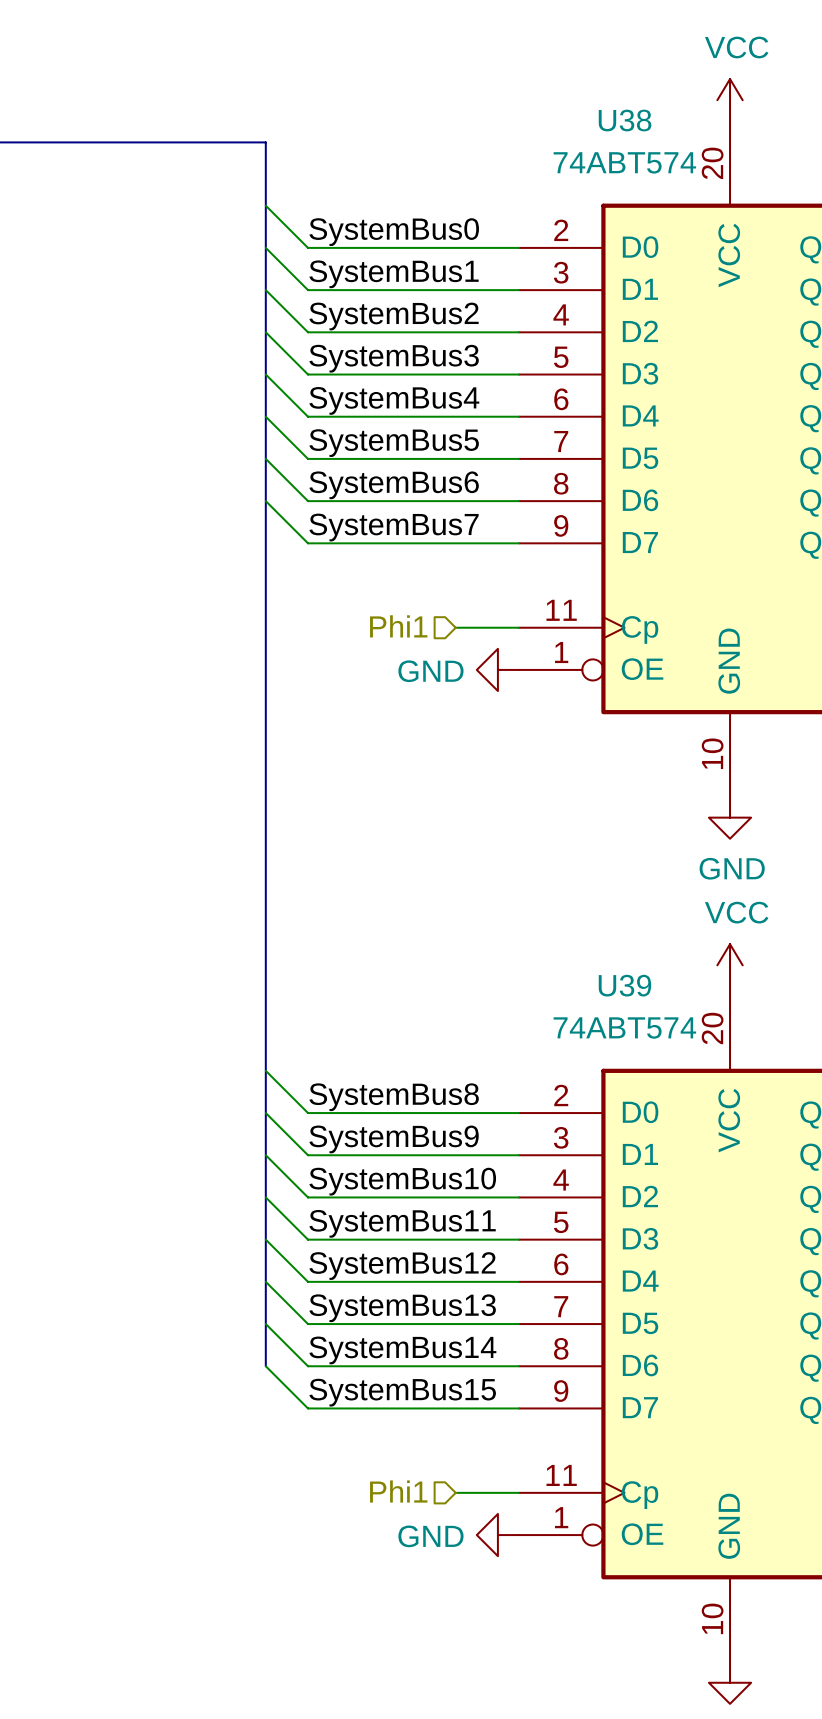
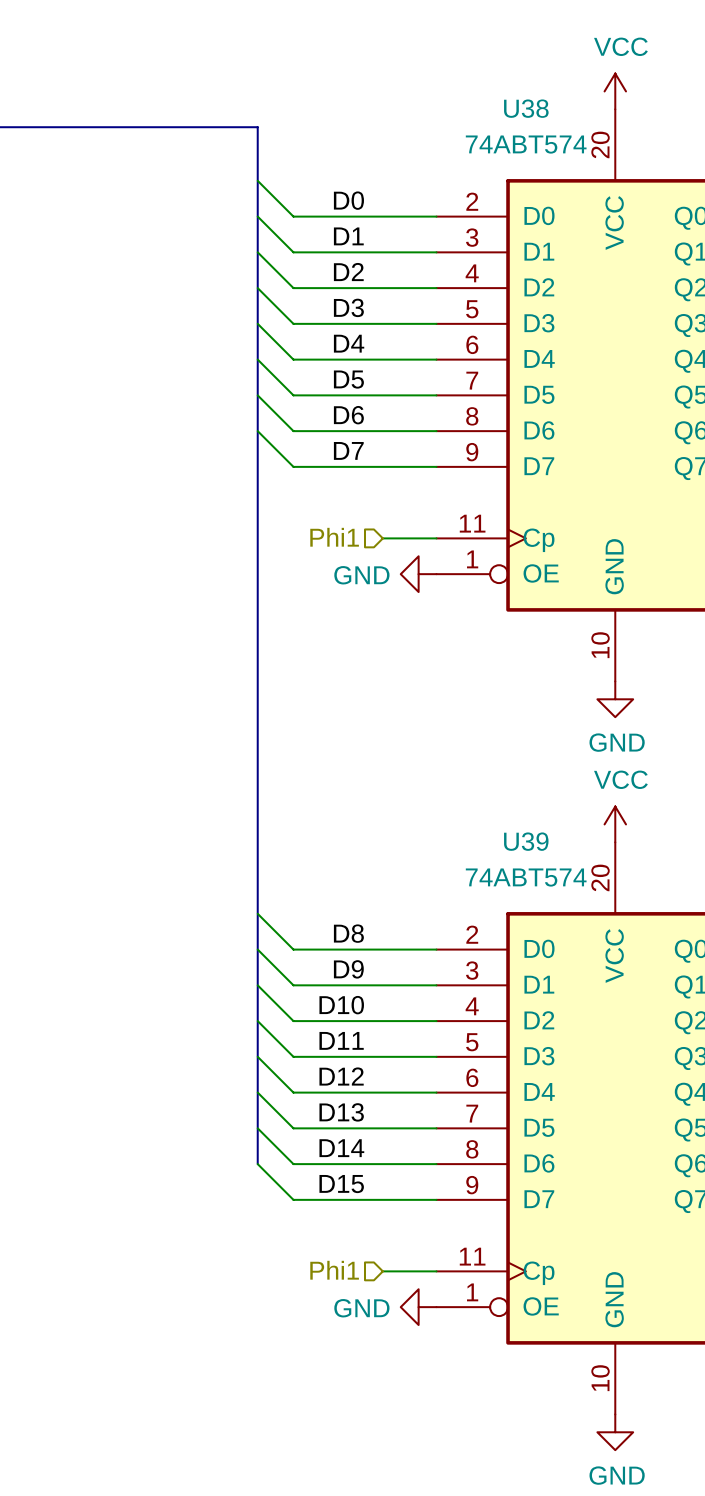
bus: (265, 142) (265, 1366) -> (221, 127) (257, 127) (257, 1164)
wire: (265, 205) (308, 247) (350, 247) -> (257, 180) (293, 216)
label: none -> D0 (348, 200)
label: SystemBus0 (394, 232) -> none
wire: (265, 247) (308, 290) (350, 290) -> (257, 216) (293, 252)
label: none -> D1 (348, 236)
label: SystemBus1 (394, 274) -> none
wire: (265, 290) (308, 332) (350, 332) -> (257, 252) (293, 288)
label: none -> D2 (348, 272)
label: SystemBus2 (394, 316) -> none
wire: (265, 332) (308, 374) (350, 374) -> (257, 288) (293, 323)
label: none -> D3 (348, 307)
label: SystemBus3 (394, 358) -> none
wire: (265, 374) (308, 416) (350, 416) -> (257, 323) (293, 359)
label: none -> D4 (349, 343)
label: SystemBus4 (394, 400) -> none
wire: (265, 416) (308, 458) (350, 458) -> (257, 359) (293, 395)
label: none -> D5 (348, 379)
label: SystemBus5 (394, 443) -> none
wire: (265, 458) (308, 501) (350, 501) -> (257, 395) (293, 431)
label: none -> D6 (348, 415)
label: SystemBus6 (394, 485) -> none
wire: (265, 501) (308, 543) (350, 543) -> (257, 431) (293, 466)
label: none -> D7 (348, 450)
label: SystemBus7 (394, 527) -> none
wire: (265, 1070) (308, 1113) (350, 1113) -> (257, 913) (293, 949)
label: none -> D8 (348, 933)
label: SystemBus8 (394, 1097) -> none
wire: (265, 1113) (308, 1155) (350, 1155) -> (257, 949) (293, 985)
label: none -> D9 (348, 969)
label: SystemBus9 (394, 1139) -> none
wire: (265, 1155) (308, 1197) (350, 1197) -> (257, 985) (293, 1021)
label: none -> D10 (341, 1005)
label: SystemBus10 (402, 1181) -> none
wire: (265, 1197) (308, 1239) (350, 1239) -> (257, 1021) (293, 1056)
label: none -> D11 (341, 1040)
label: SystemBus11 (402, 1223) -> none
wire: (265, 1239) (308, 1281) (350, 1281) -> (257, 1056) (293, 1092)
label: none -> D12 (341, 1076)
label: SystemBus12 (402, 1266) -> none
wire: (265, 1281) (308, 1324) (350, 1324) -> (257, 1092) (293, 1128)
label: none -> D13 (341, 1112)
label: SystemBus13 (402, 1308) -> none
wire: (265, 1324) (308, 1366) (350, 1366) -> (257, 1128) (293, 1164)
label: none -> D14 (341, 1148)
label: SystemBus14 (402, 1350) -> none
wire: (265, 1366) (308, 1408) (350, 1408) -> (257, 1164) (293, 1199)
label: none -> D15 (341, 1184)
label: SystemBus15 (402, 1392) -> none

